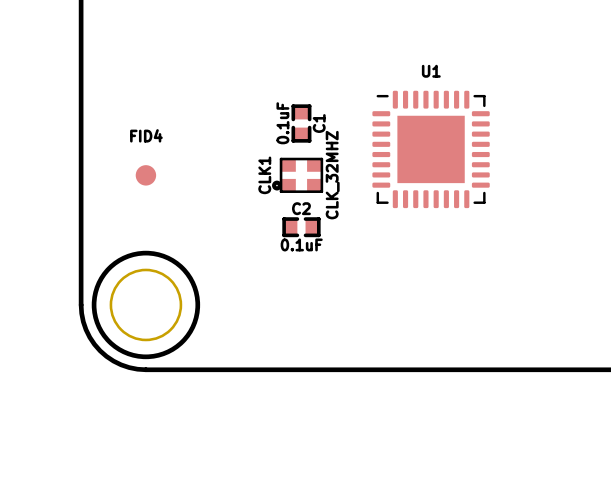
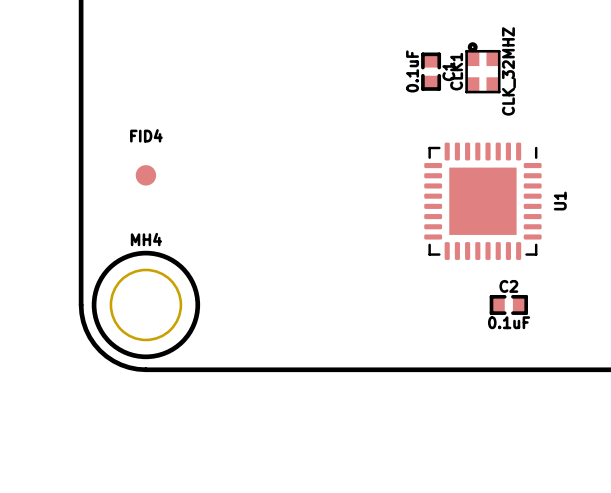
C1 position: (301, 123) -> (431, 71)
U1 rotation: 0° (431, 149) -> 90° clockwise (482, 201)
U1 position: (431, 149) -> (482, 201)
CLK1 rotation: 0° (297, 175) -> 90° clockwise (482, 67)
CLK1 position: (297, 175) -> (482, 67)
C2 position: (301, 227) -> (508, 304)
MH4 name: none -> MH4 (146, 239)

